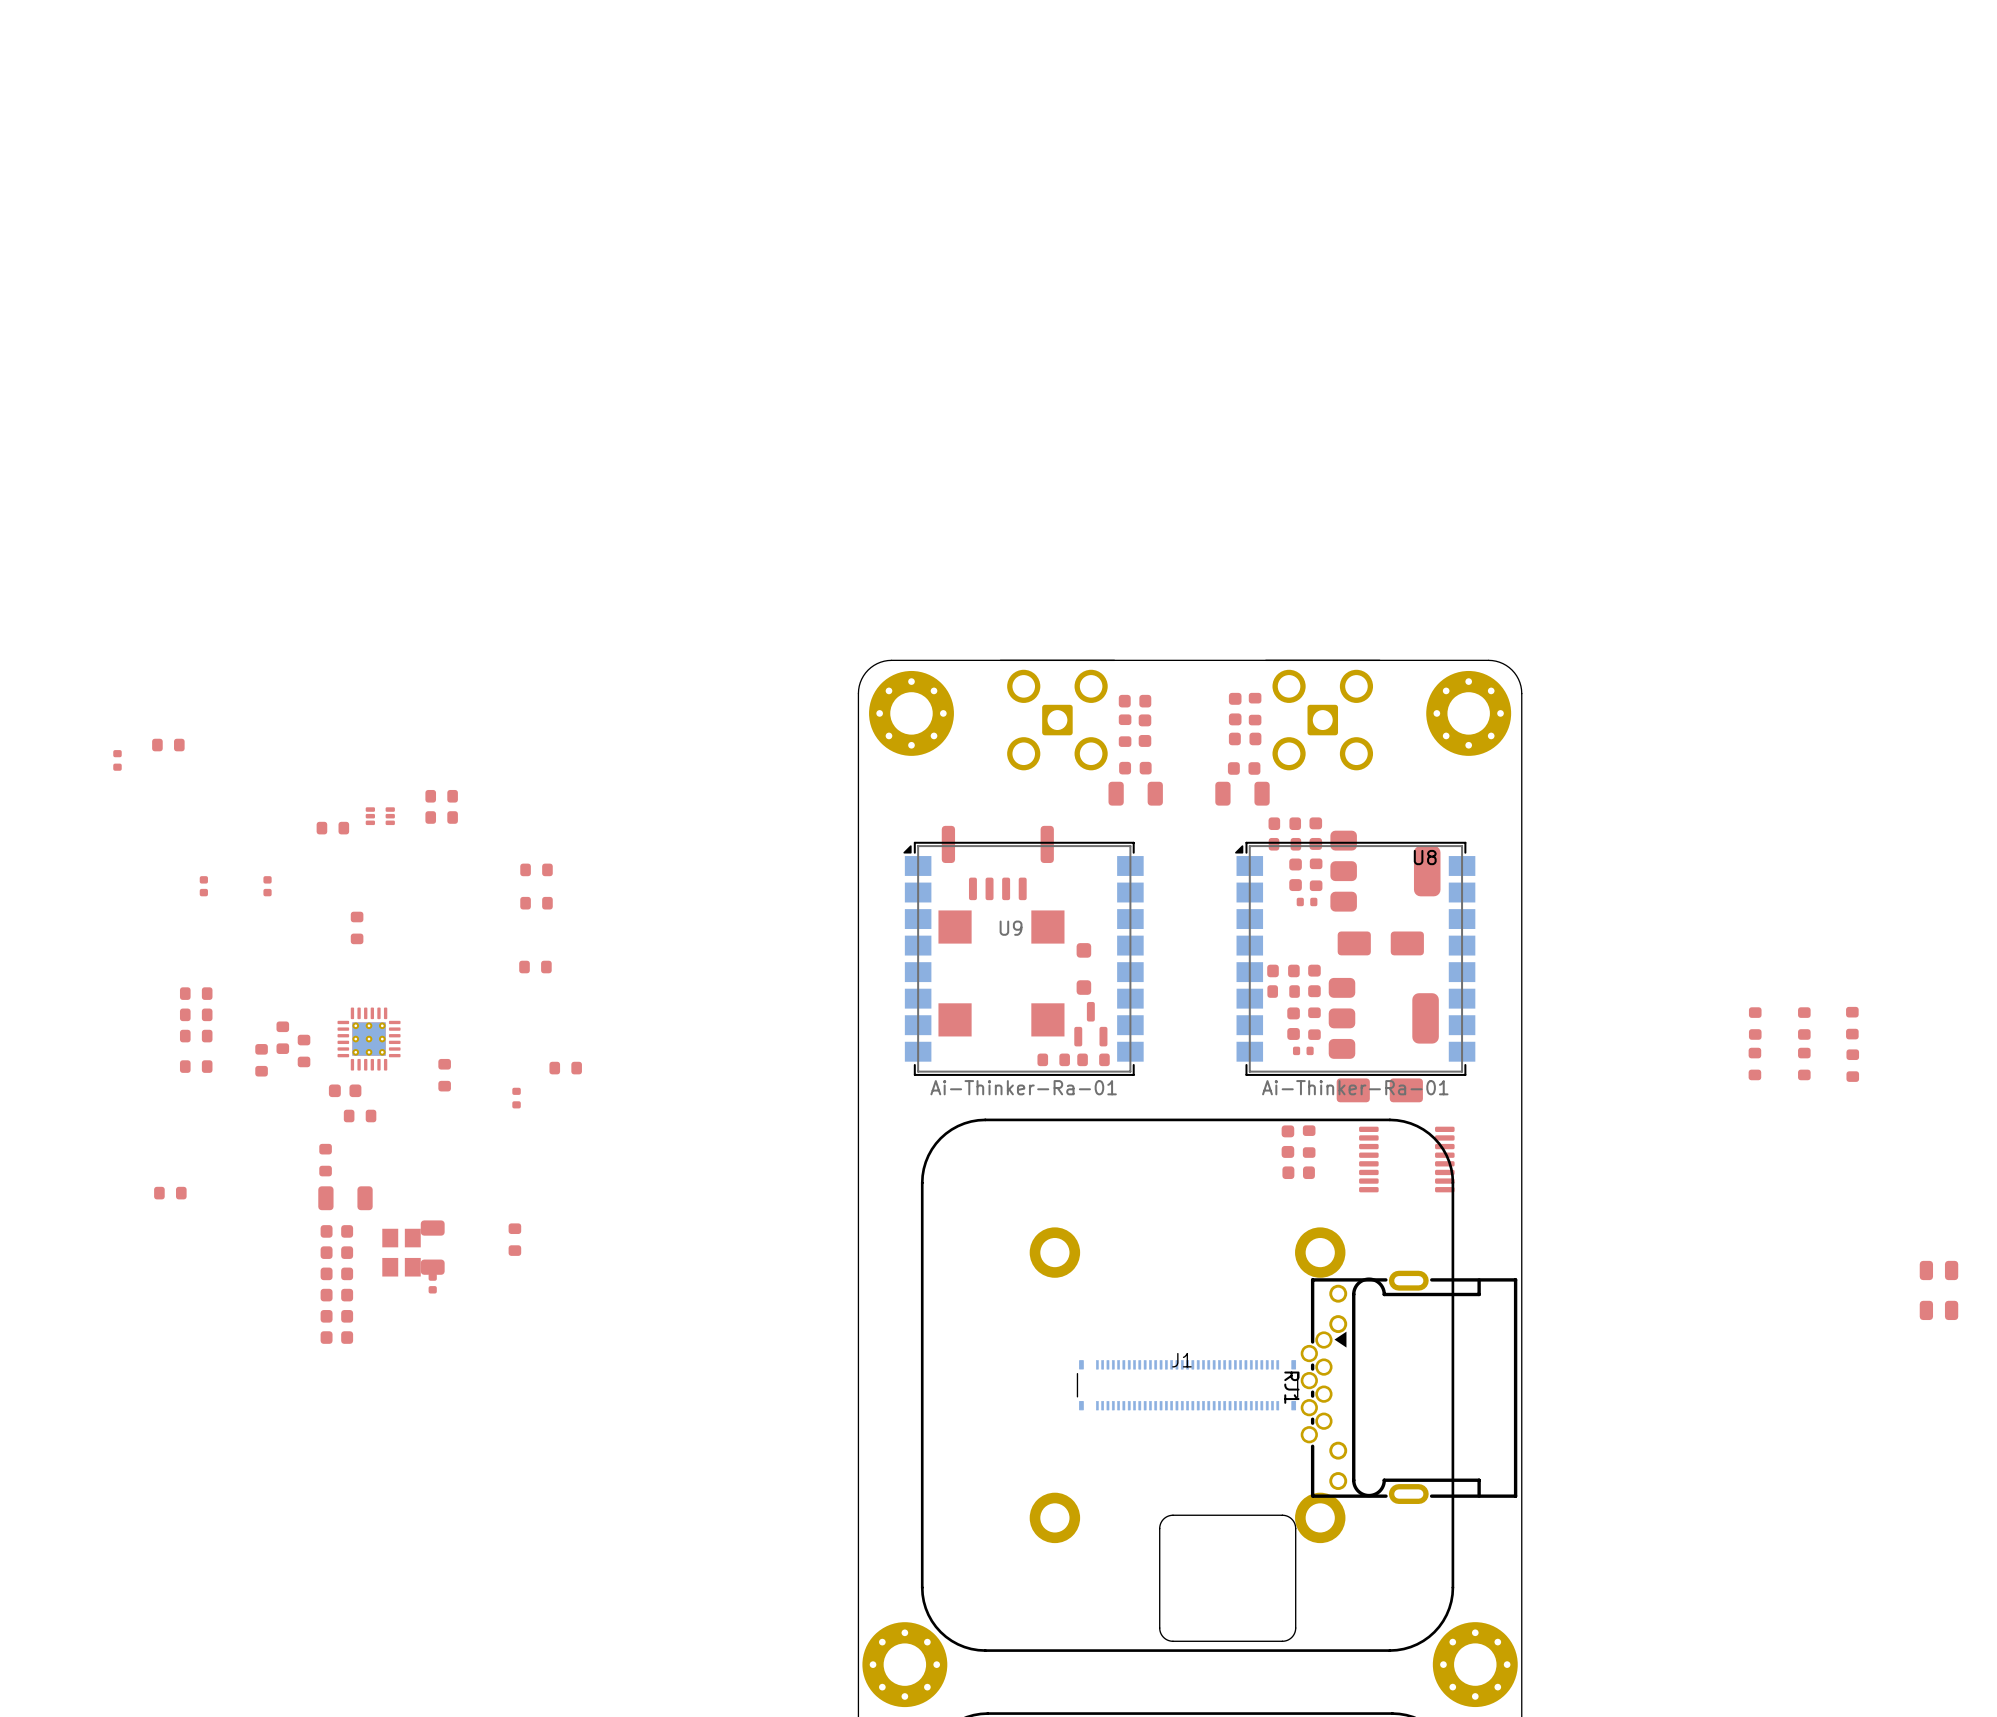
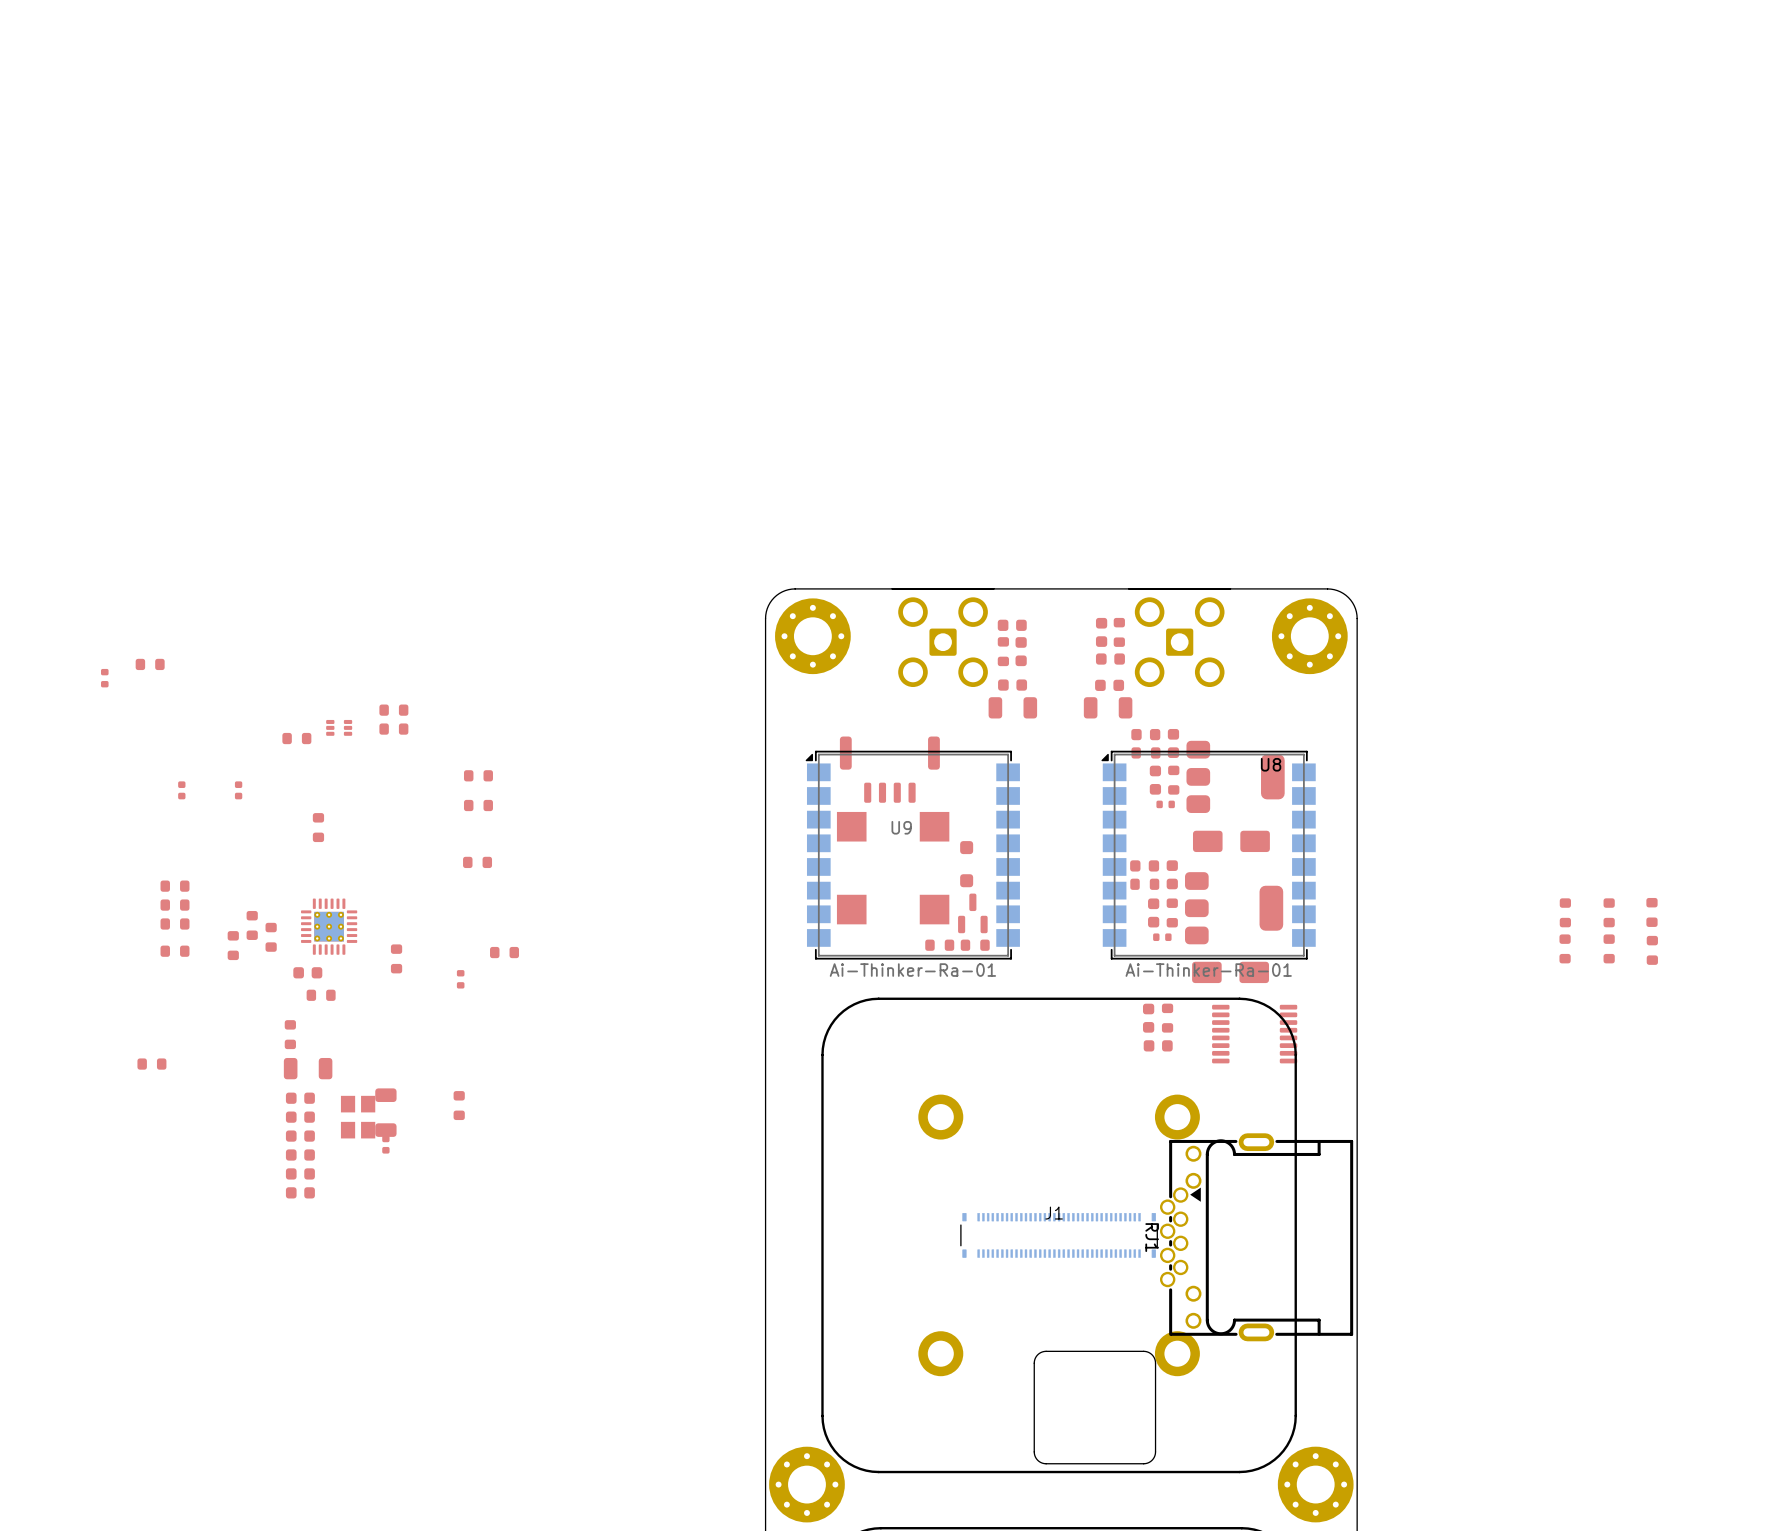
part: (1938, 1270) -> none
part: (1938, 1310) -> none

